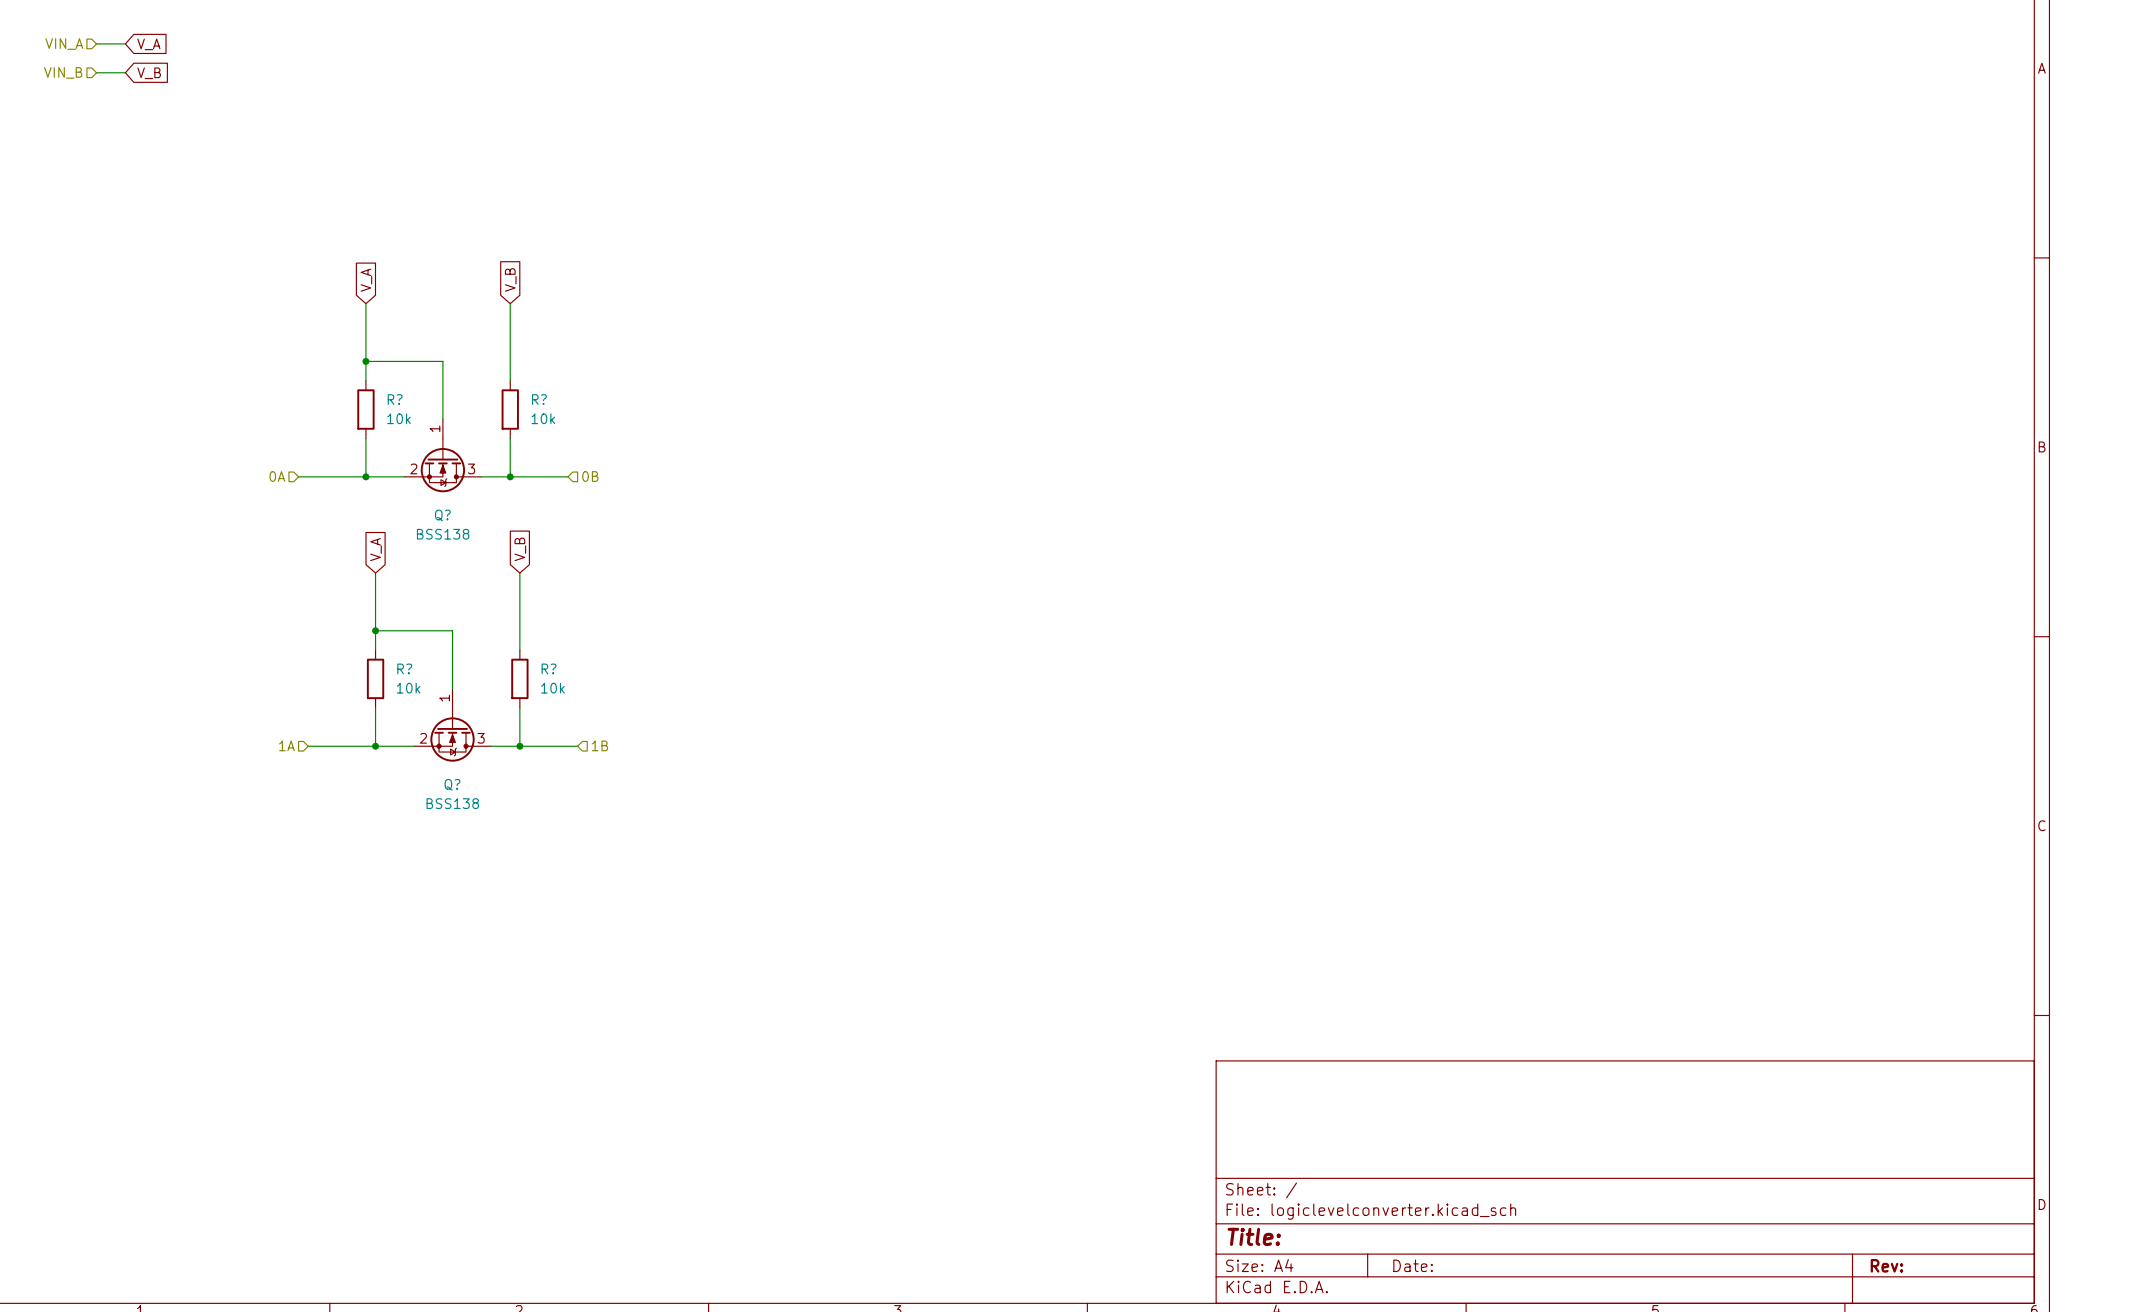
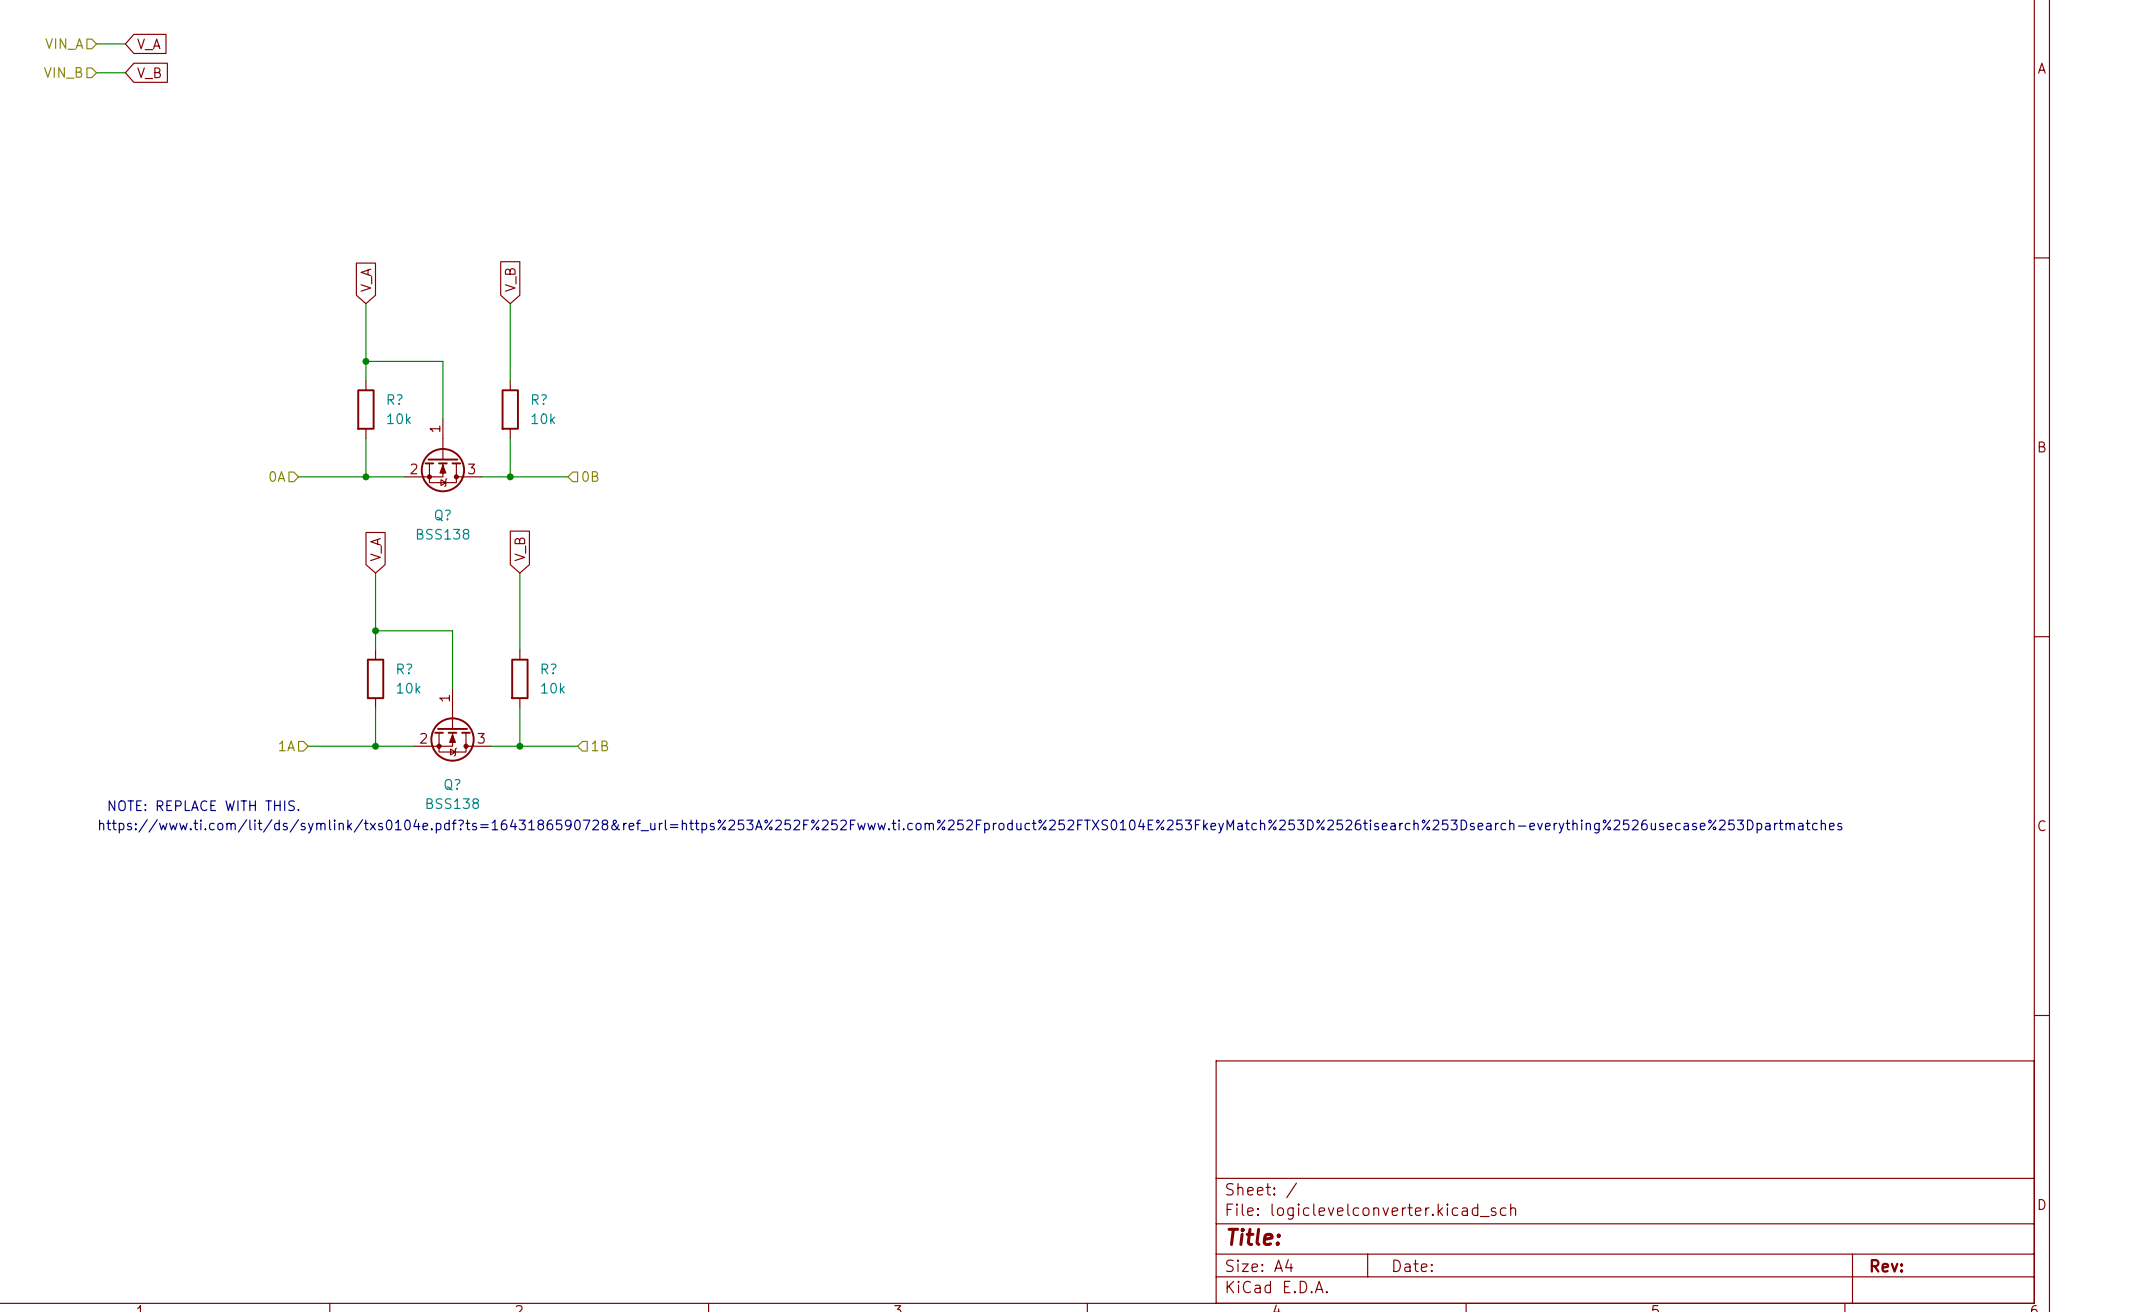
text: none -> NOTE: REPLACE WITH THIS. (204, 805)
text: none -> https://www.ti.com/lit/ds/symlink/txs0104e.pdf?ts=1643186590728&ref_url=https%253A%252F%252Fwww.ti.com%252Fproduct%252FTXS0104E%253FkeyMatch%253D%2526tisearch%253Dsearch-everything%2526usecase%253Dpartmatches (970, 826)

